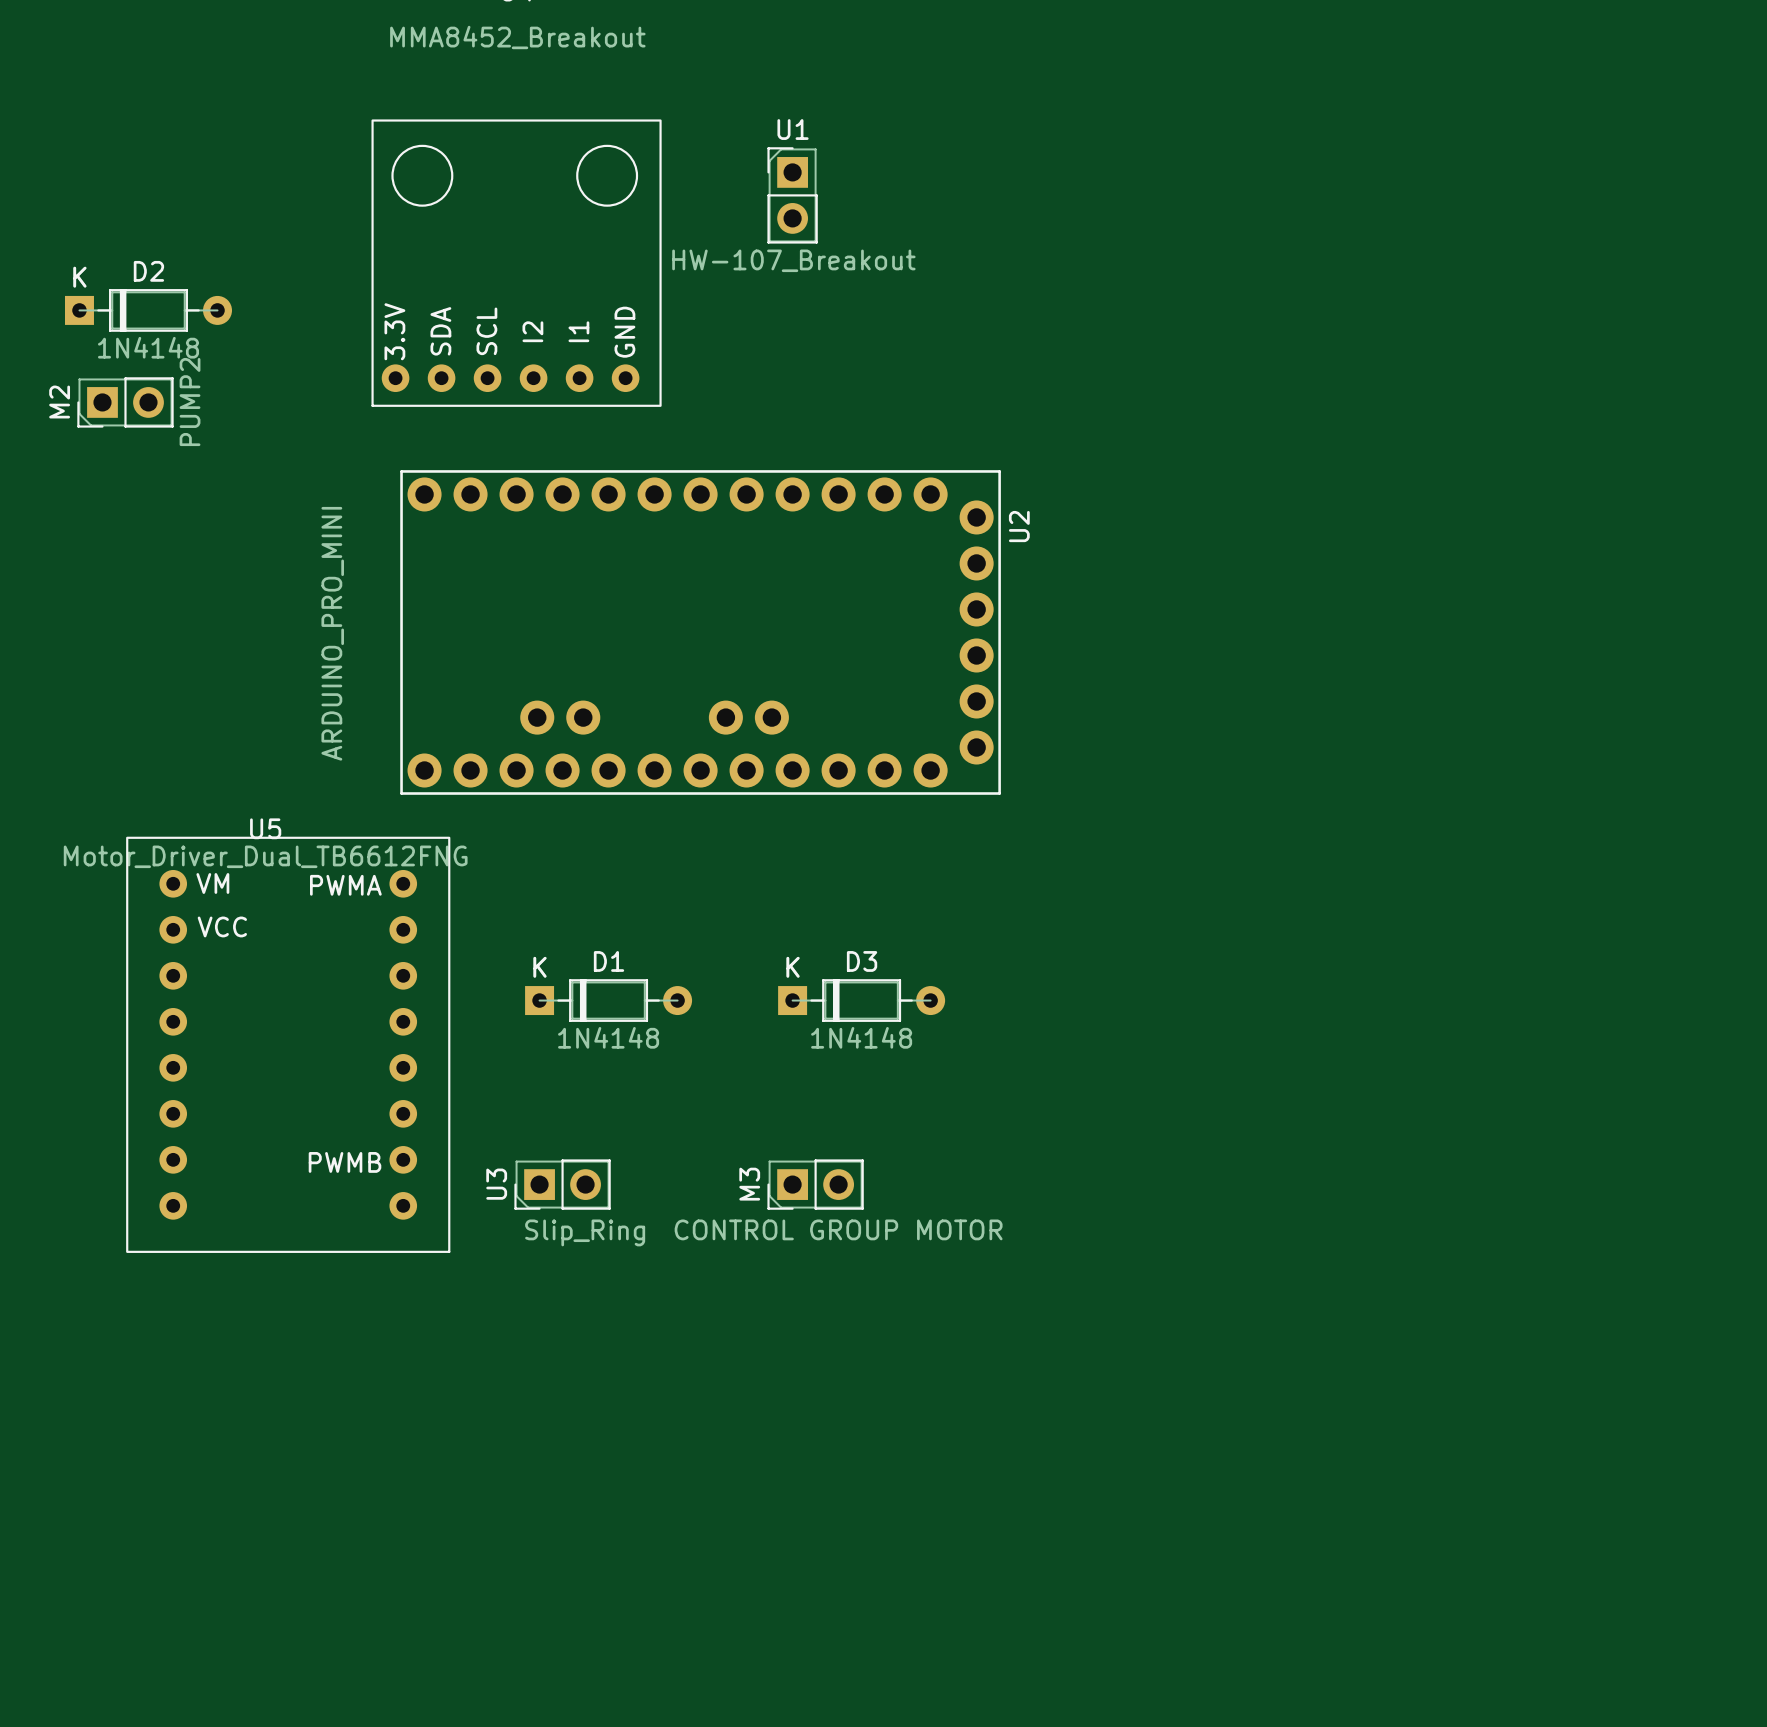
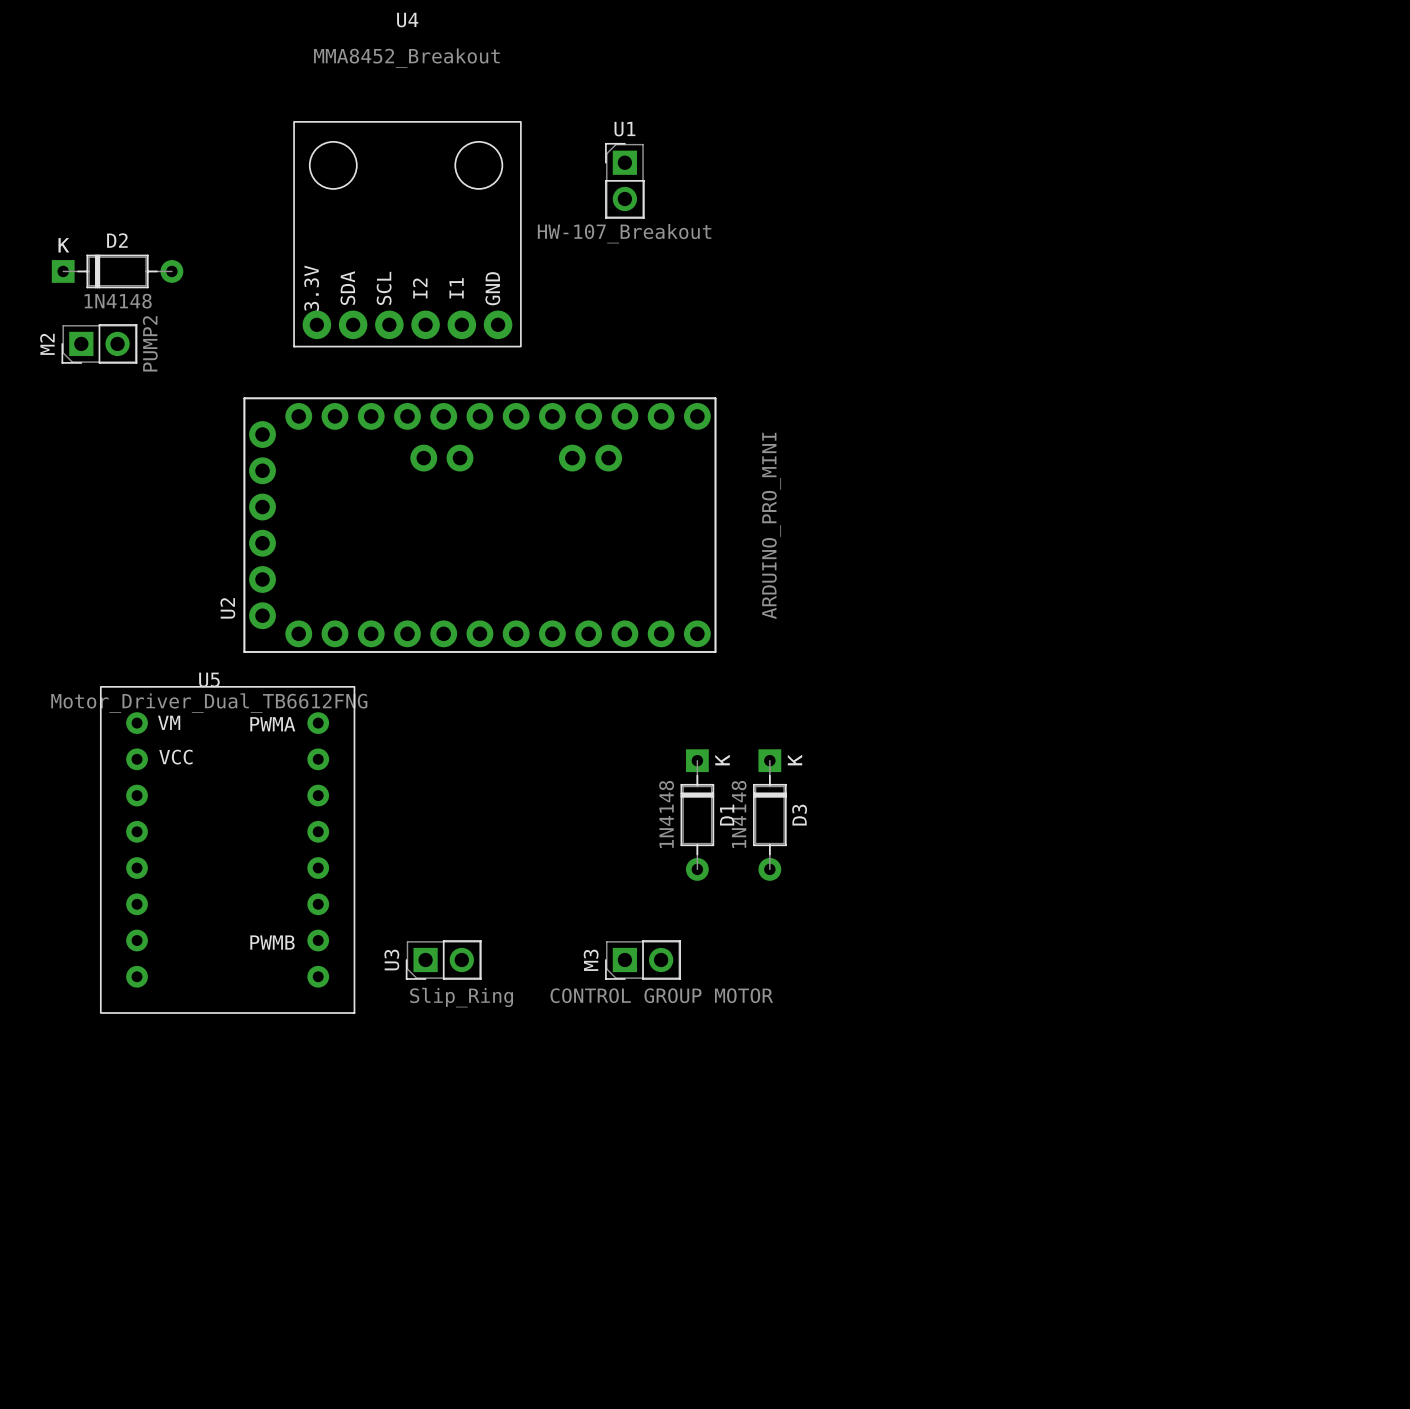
U4 footprint: [371, 119, 662, 407] -> [293, 121, 522, 348]
U2 rotation: 0° (700, 632) -> 180° (479, 525)
D1 rotation: 0° (608, 1000) -> 90° clockwise (697, 815)
D1 position: (608, 1000) -> (697, 815)
D3 rotation: 0° (861, 1000) -> 90° clockwise (769, 815)
D3 position: (861, 1000) -> (769, 815)

